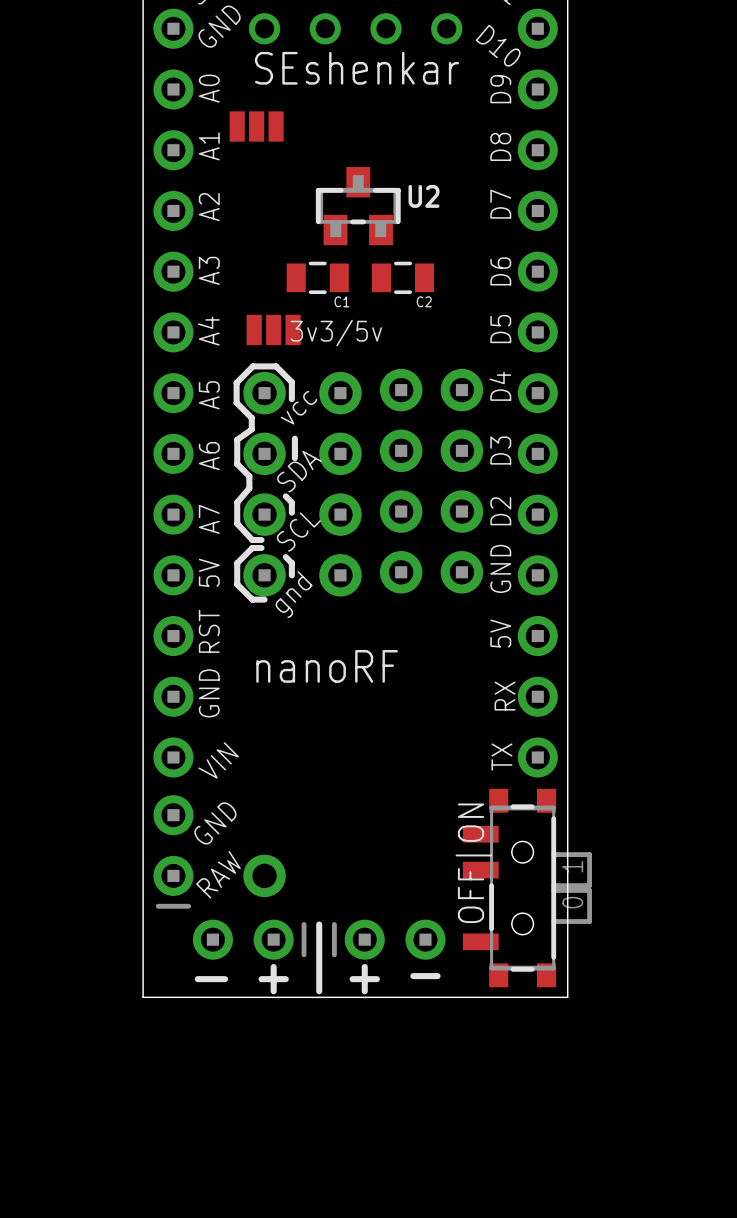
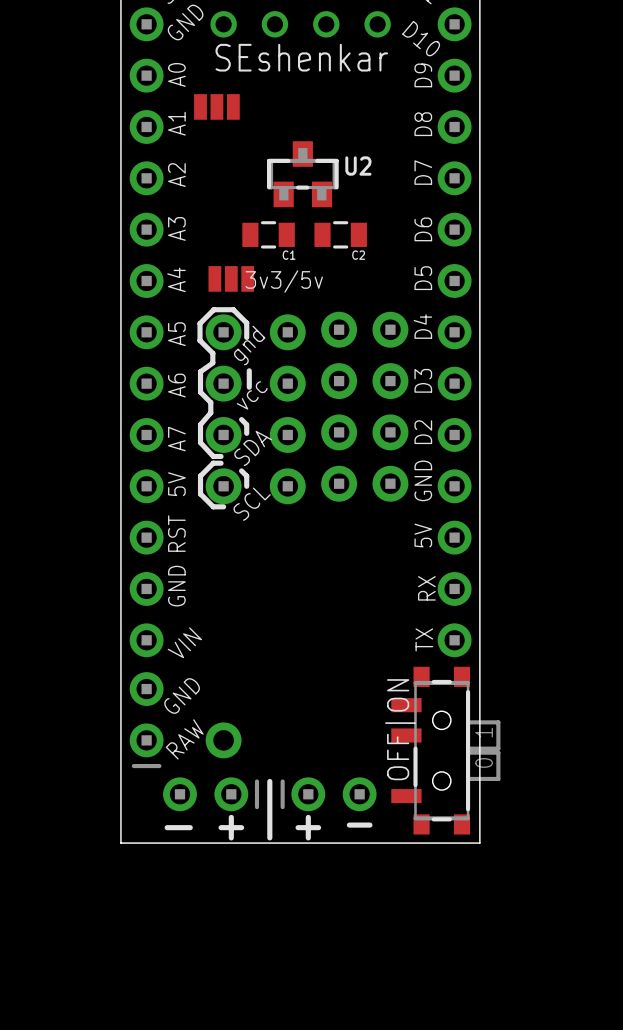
text: vcc (298, 407) -> gnd (249, 345)
text: SDA (299, 471) -> vcc (252, 395)
text: SCL (298, 532) -> SDA (253, 448)
text: gnd (294, 594) -> SCL (252, 504)
text: nanoRF (327, 666) -> none

